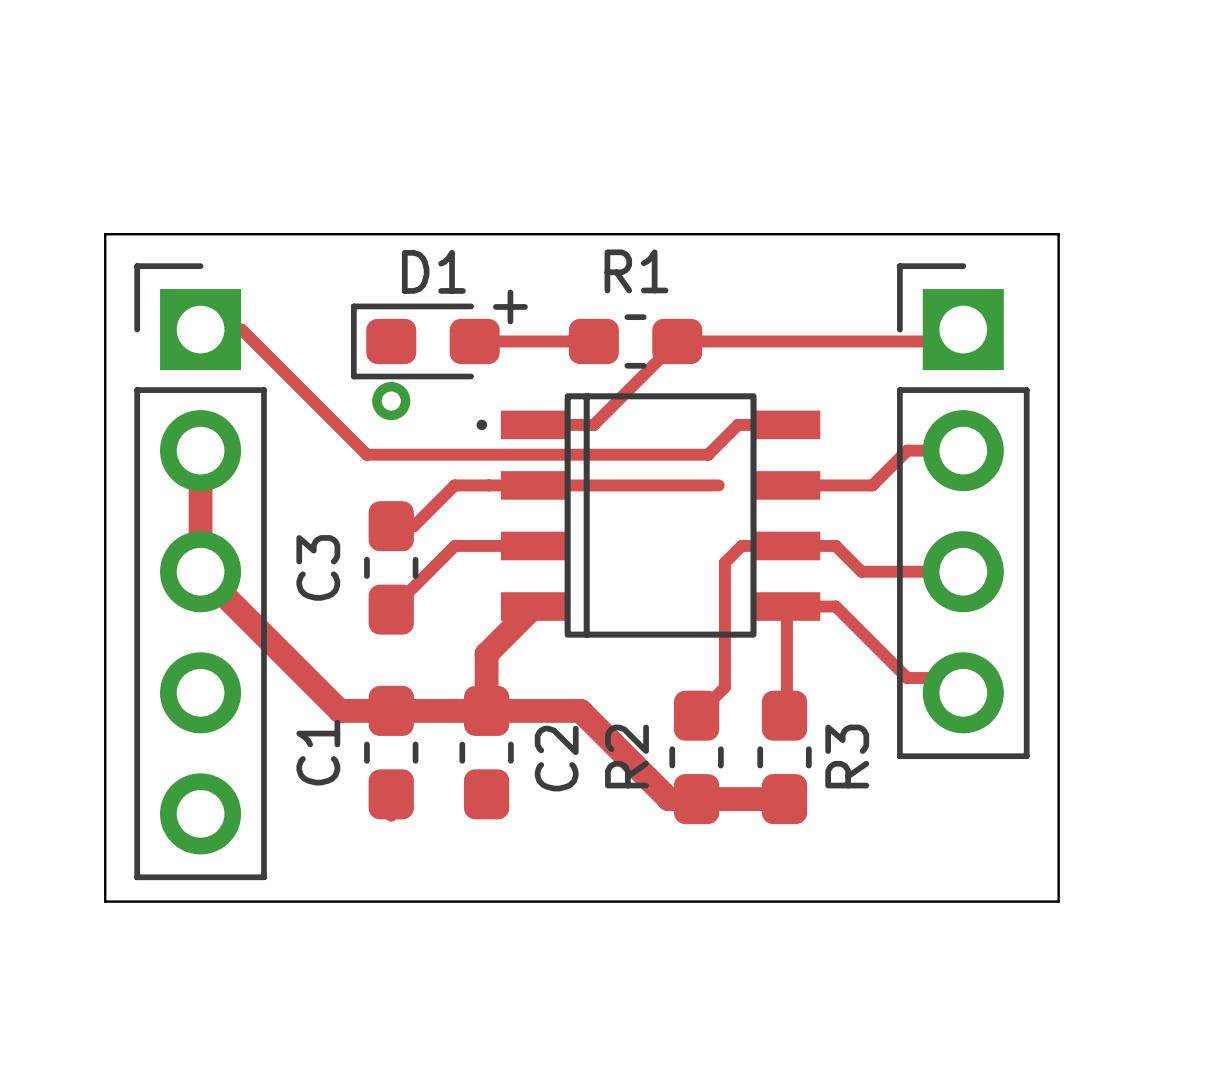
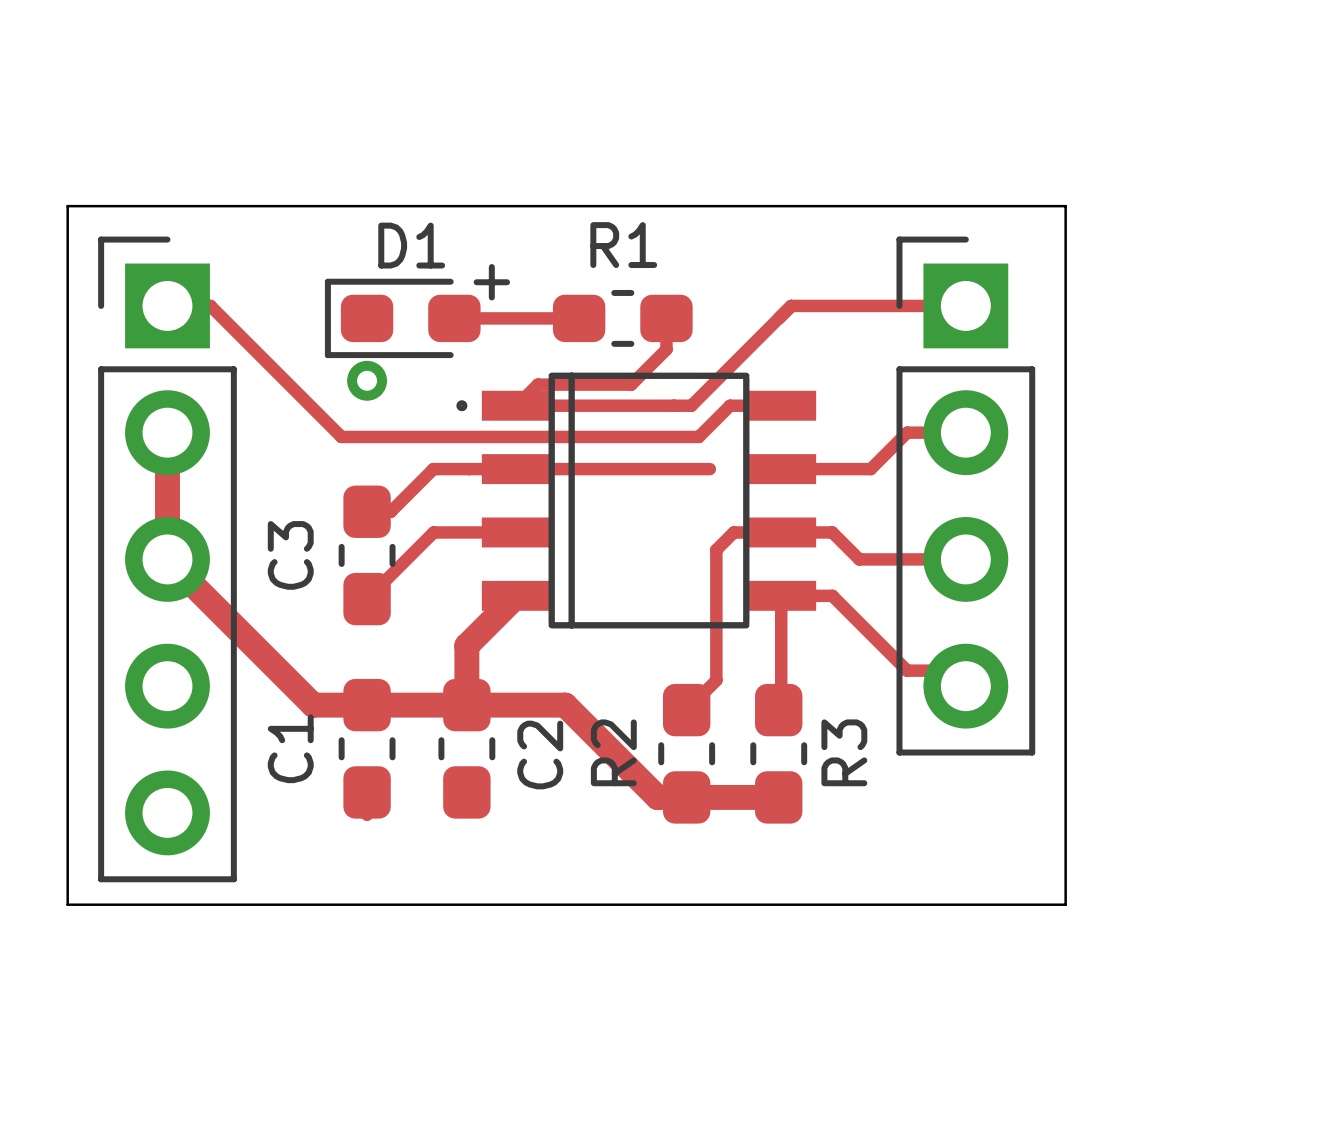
track: (963, 329) (951, 341) (677, 341) (593, 424) -> (965, 305) (791, 305) (691, 405) (579, 405)
track: none -> (666, 318) (666, 349) (631, 384) (537, 384) (516, 405)

